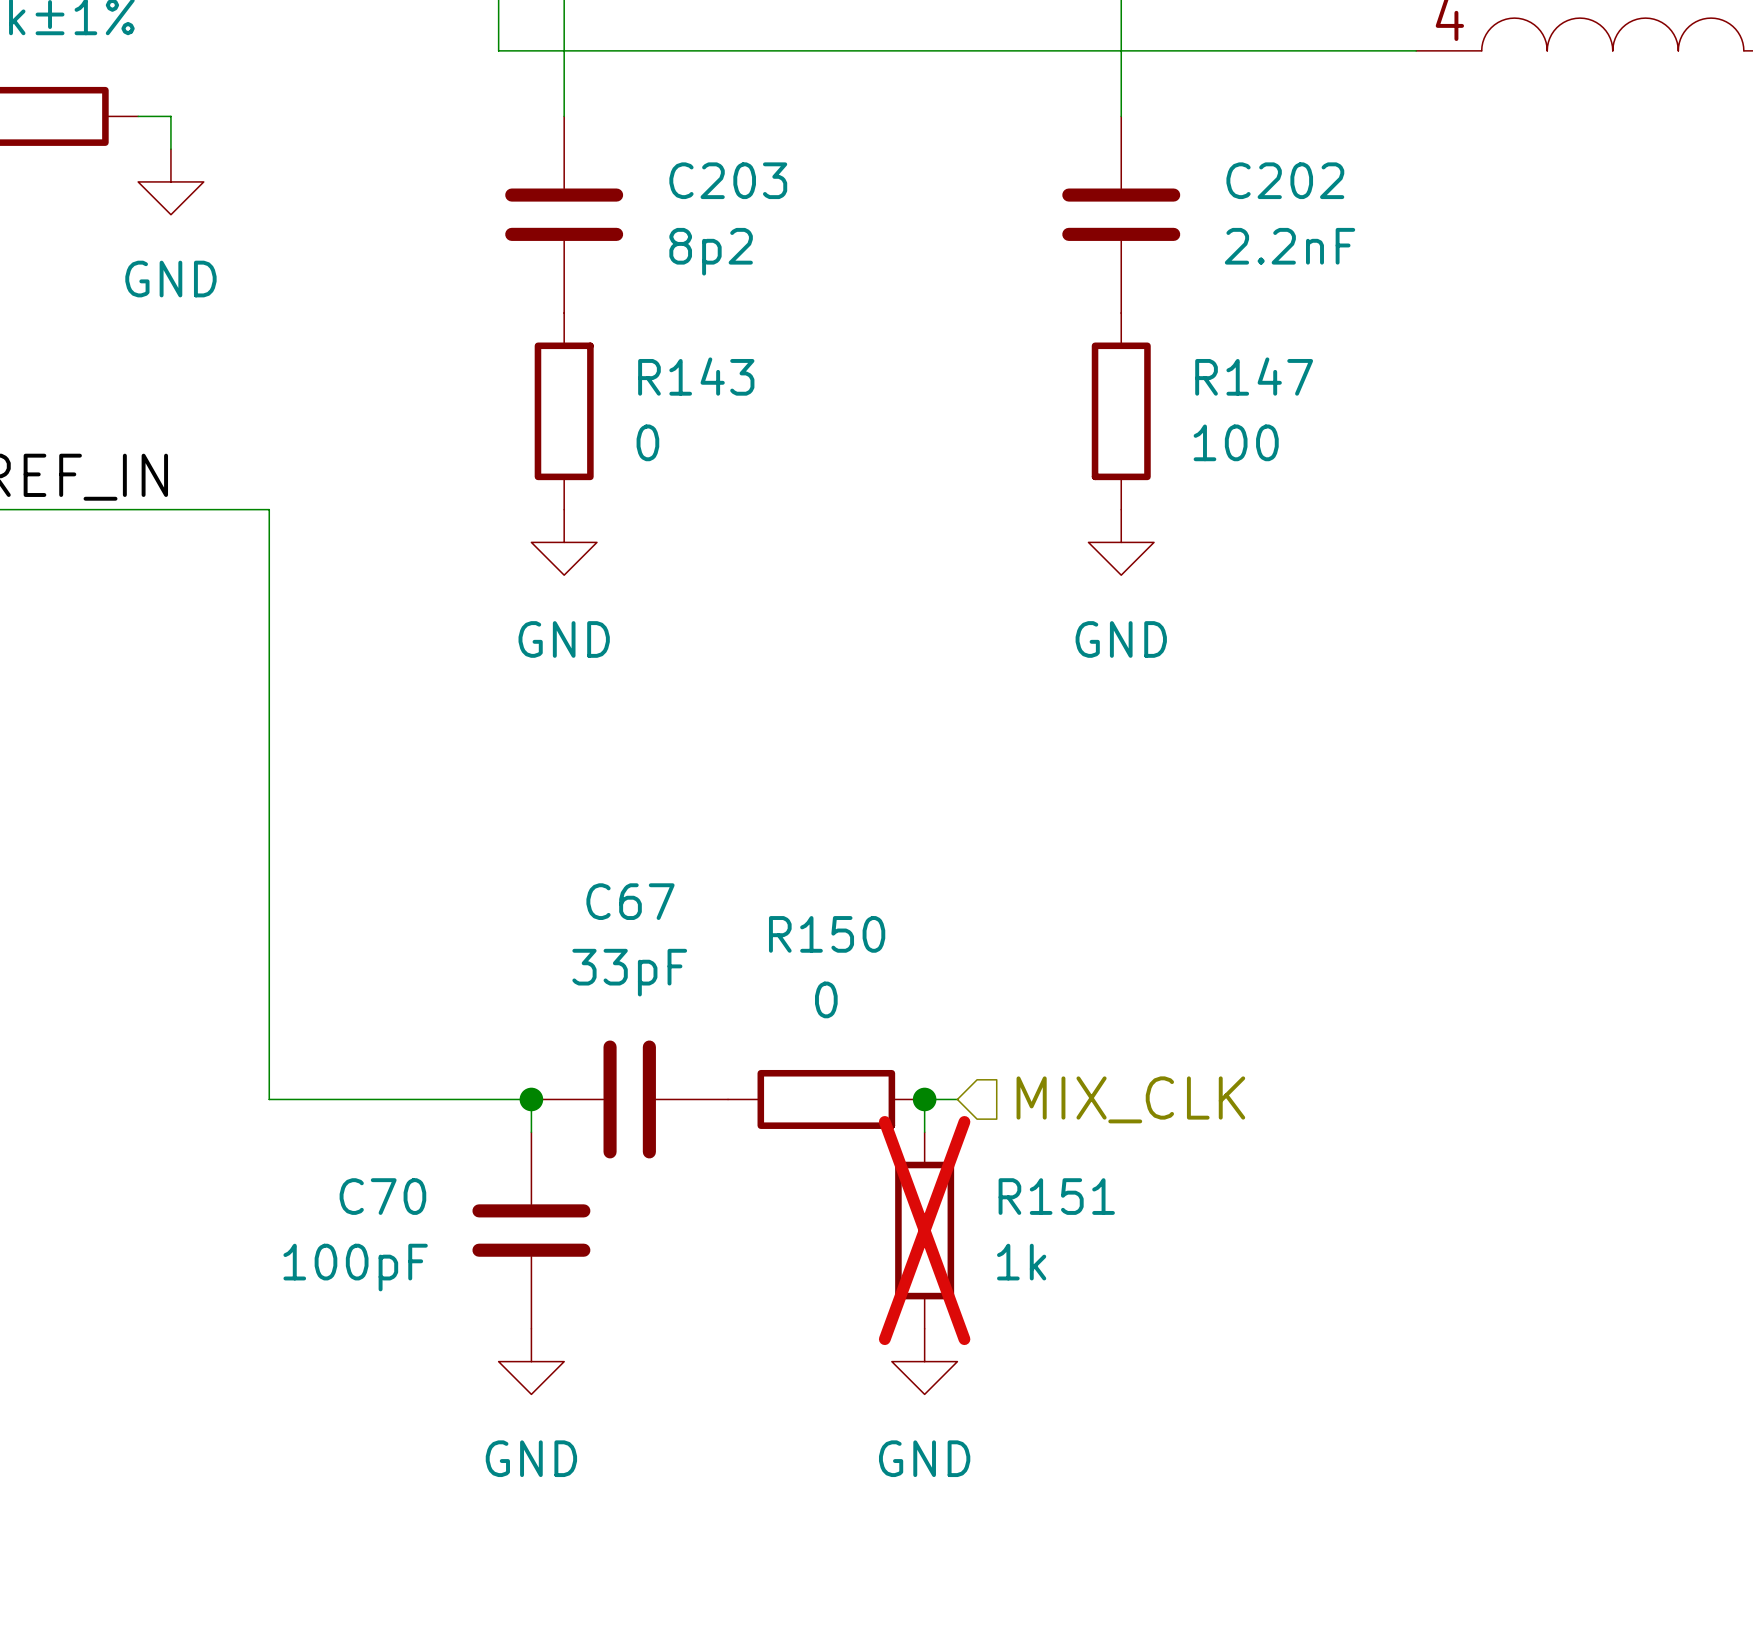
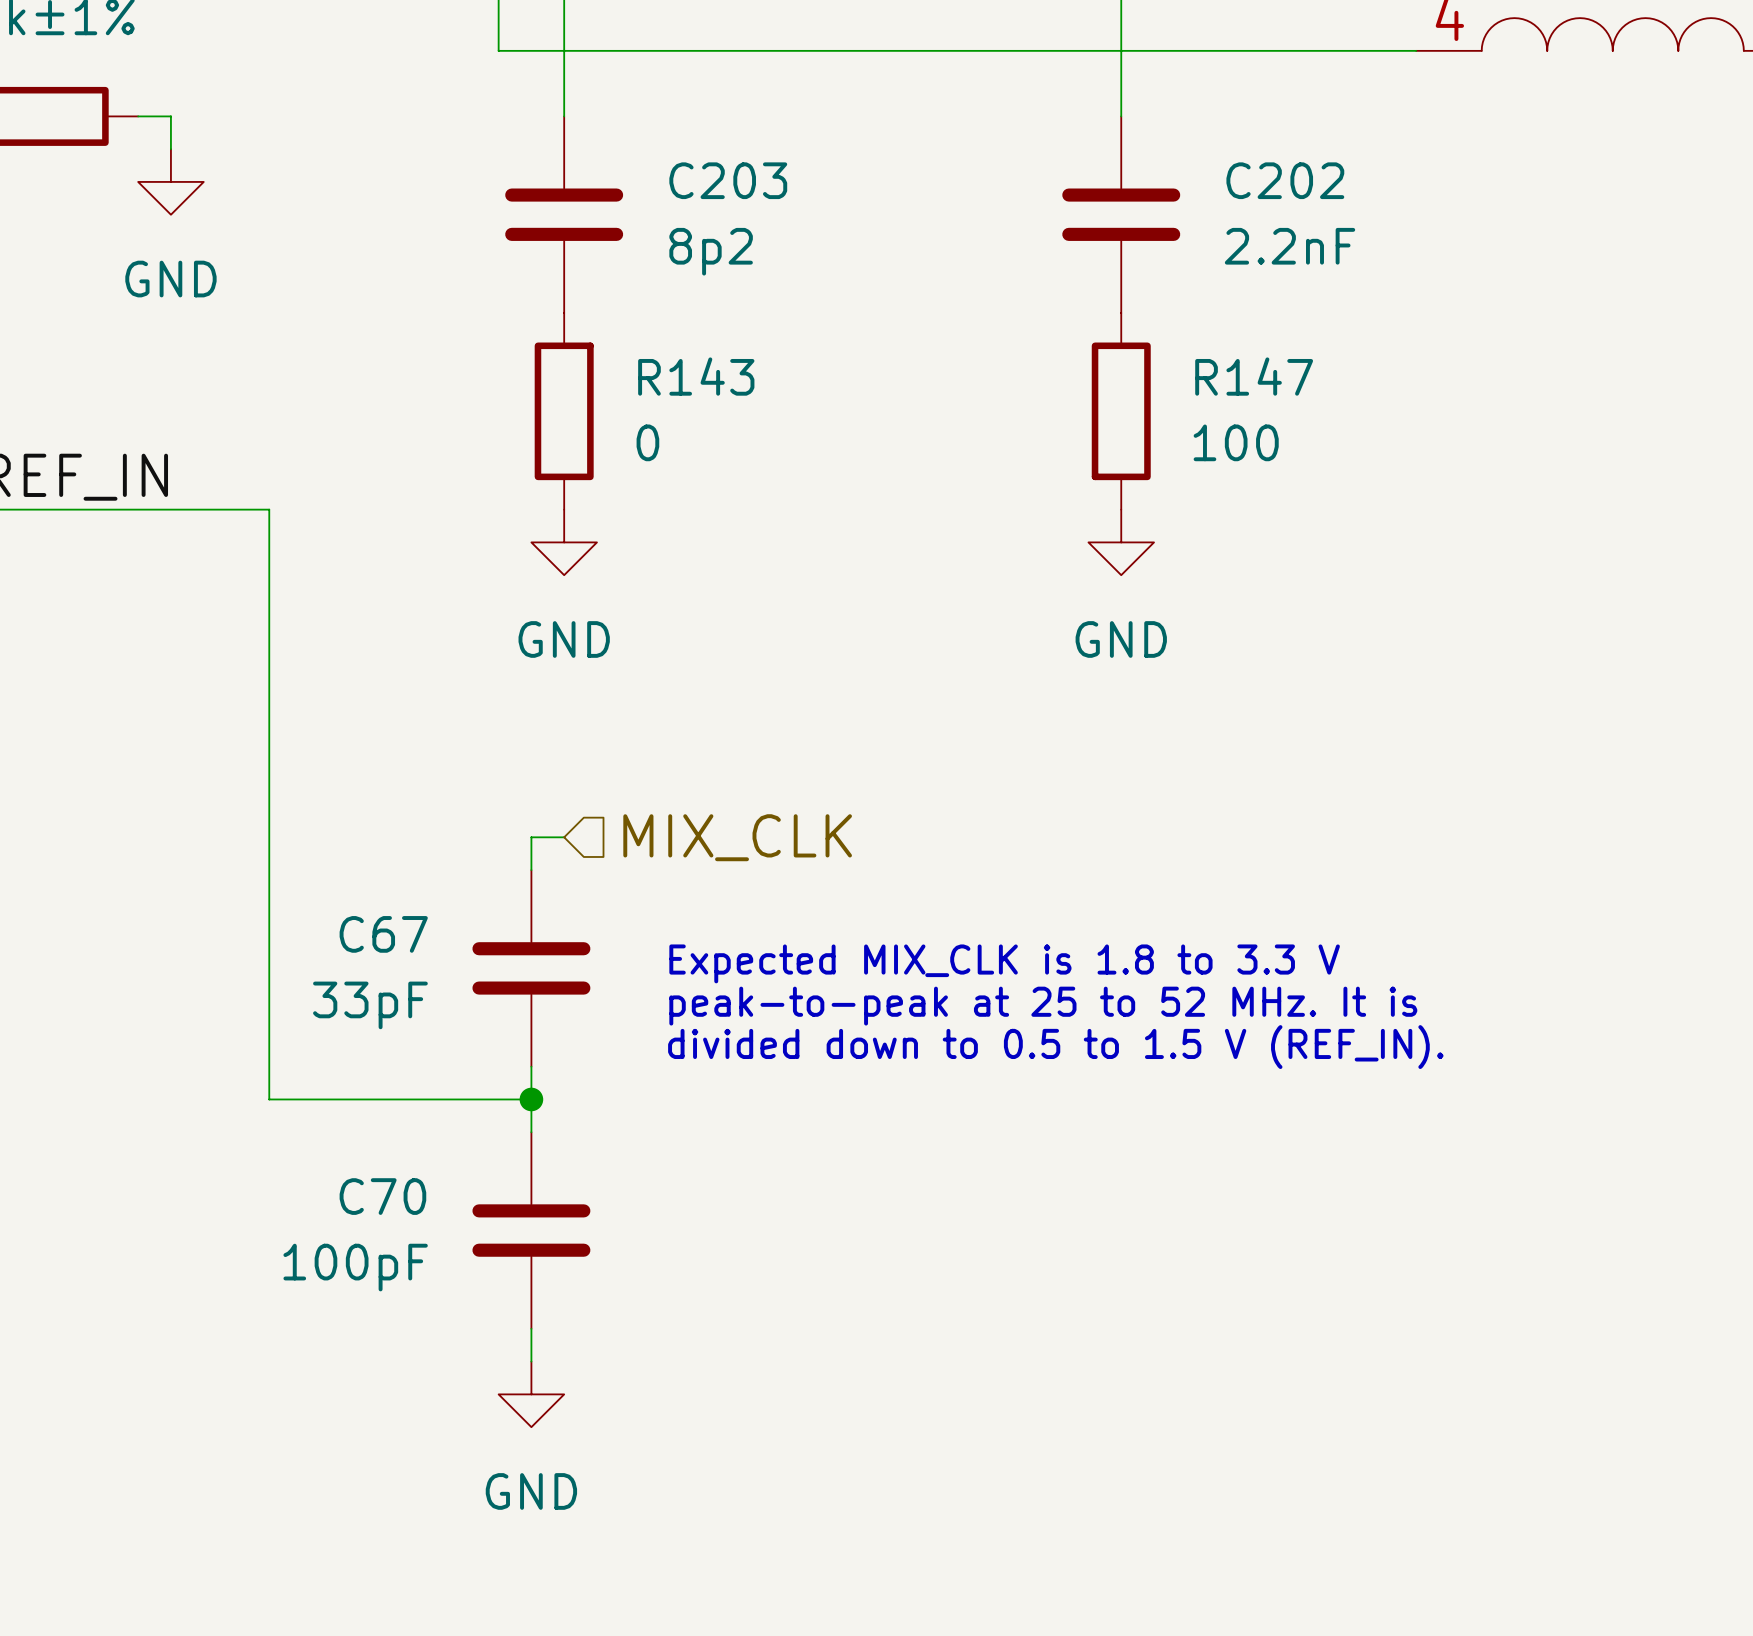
C67 name position: C67 (630, 901) -> C67 (383, 934)
text: none -> Expected MIX_CLK is 1.8 to 3.3 V (1004, 963)
C67 value position: 33pF (629, 972) -> 33pF (370, 1005)
text: none -> peak-to-peak at 25 to 52 MHz. It is (1043, 1006)
text: none -> divided down to 0.5 to 1.5 V (REF_IN). (1055, 1047)
wire: none -> (531, 1066) (531, 1099)
C67 rotation: 0° (629, 1099) -> 90° clockwise (531, 968)
C67 position: (629, 1099) -> (531, 968)
R150: 0 (826, 1099) -> none
junction: (924, 1099) -> none
wire: (957, 1099) (924, 1099) (924, 1132) -> (564, 837) (531, 837) (531, 870)
hierarchical label position: MIX_CLK (1130, 1099) -> MIX_CLK (737, 837)
R151: 1k (924, 1230) -> none
power symbol position: GND (531, 1361) -> GND (531, 1394)
power symbol: GND (924, 1361) -> none

